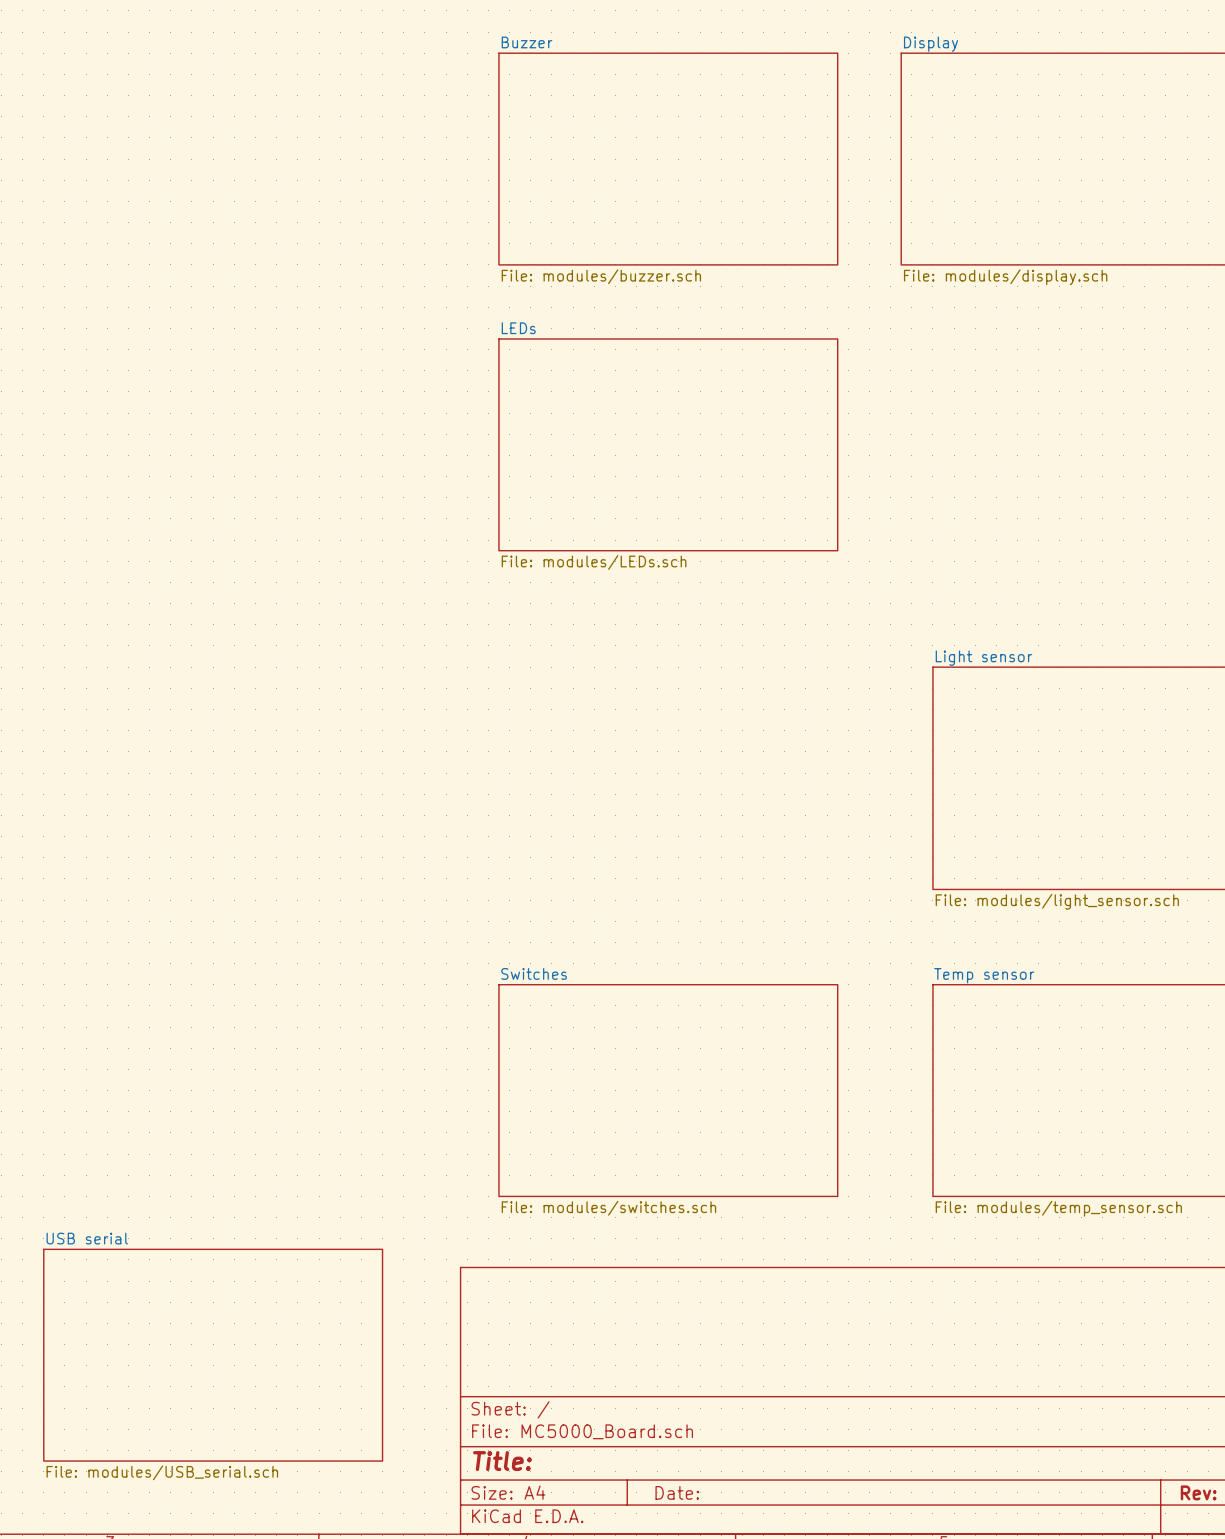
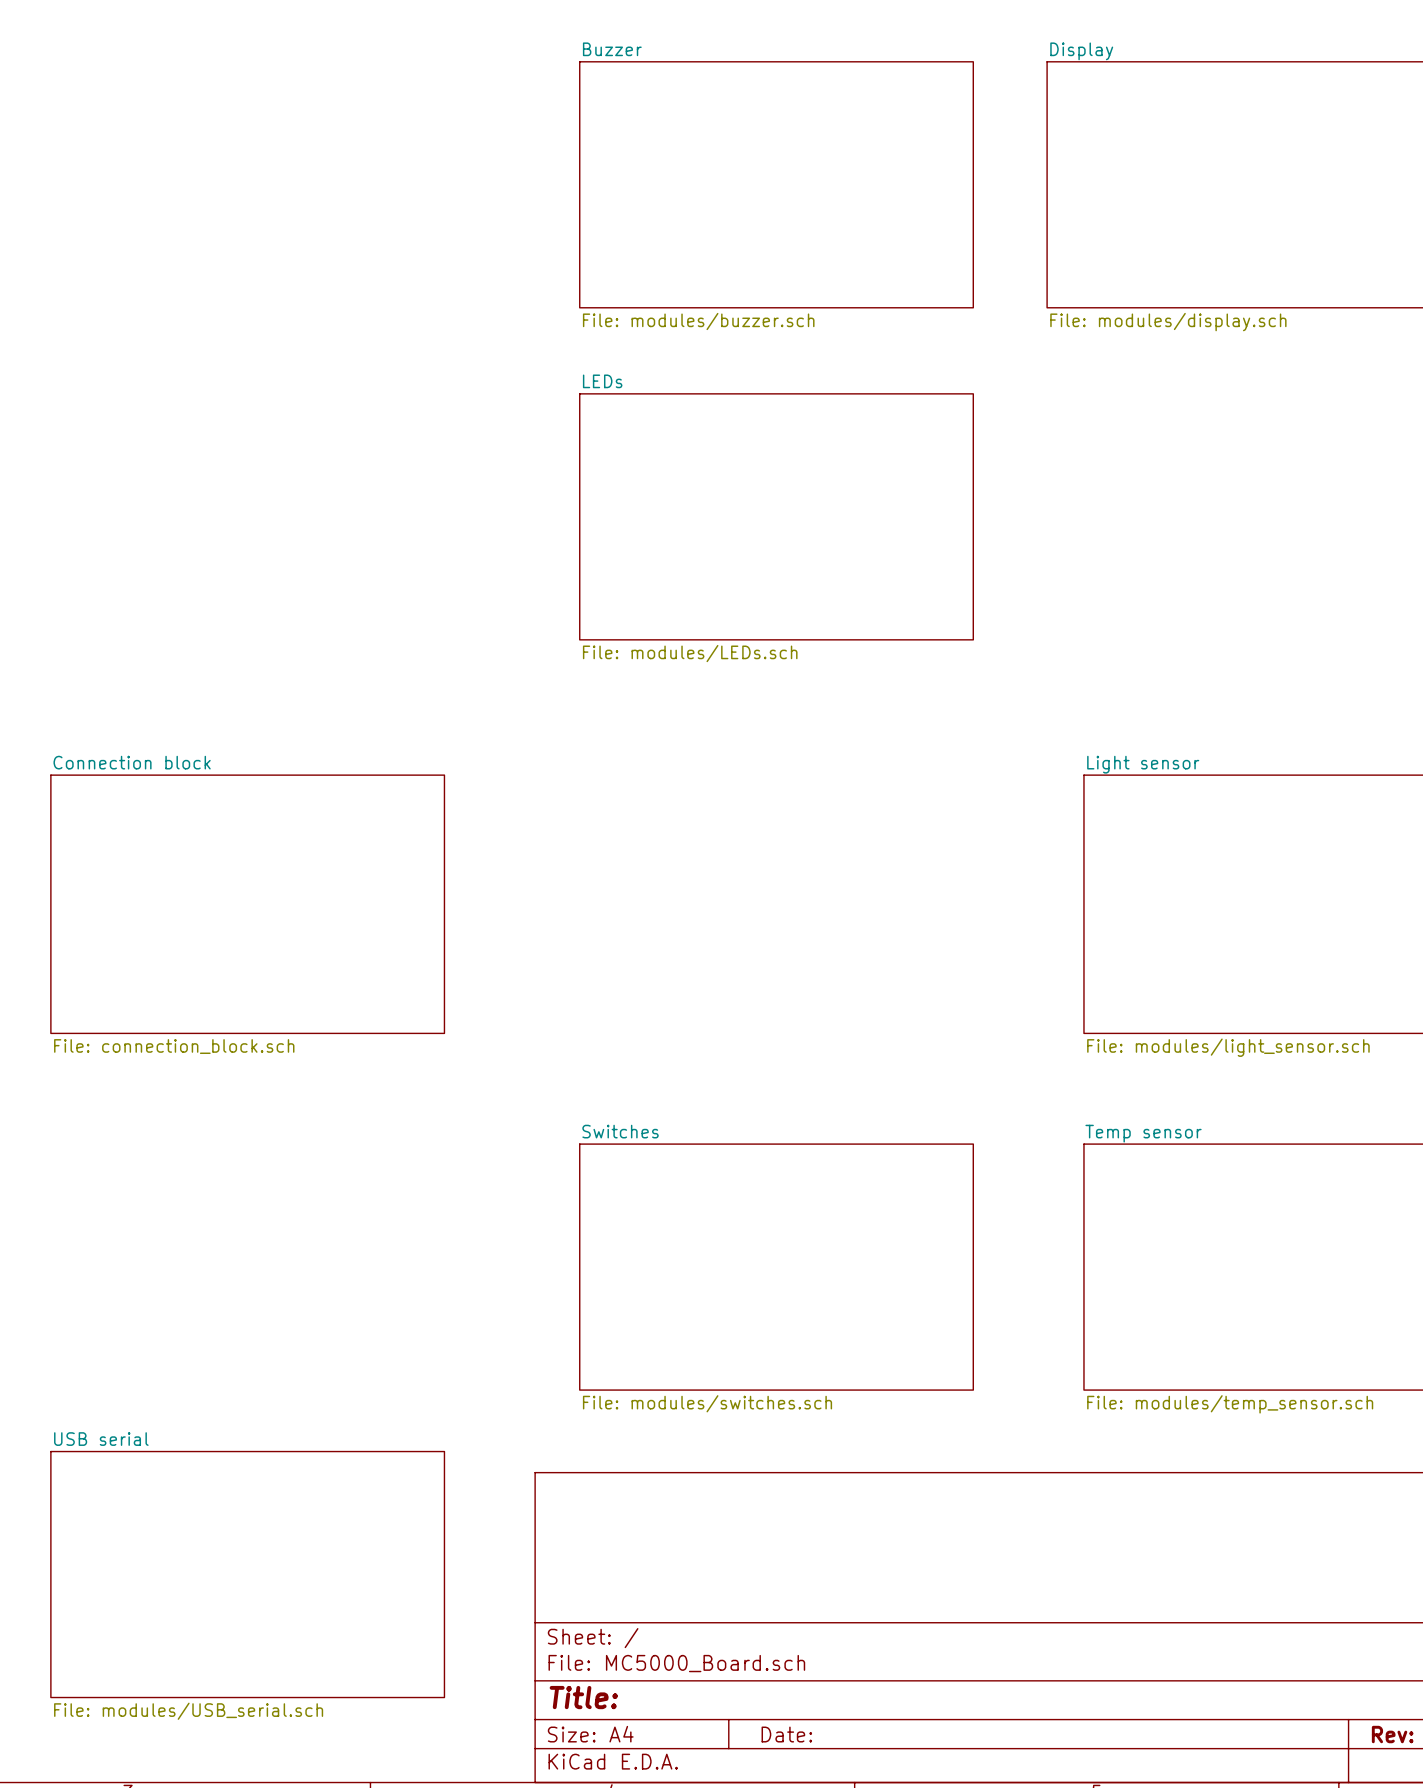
sheet Connection block: none -> File: connection_block.sch (247, 904)

